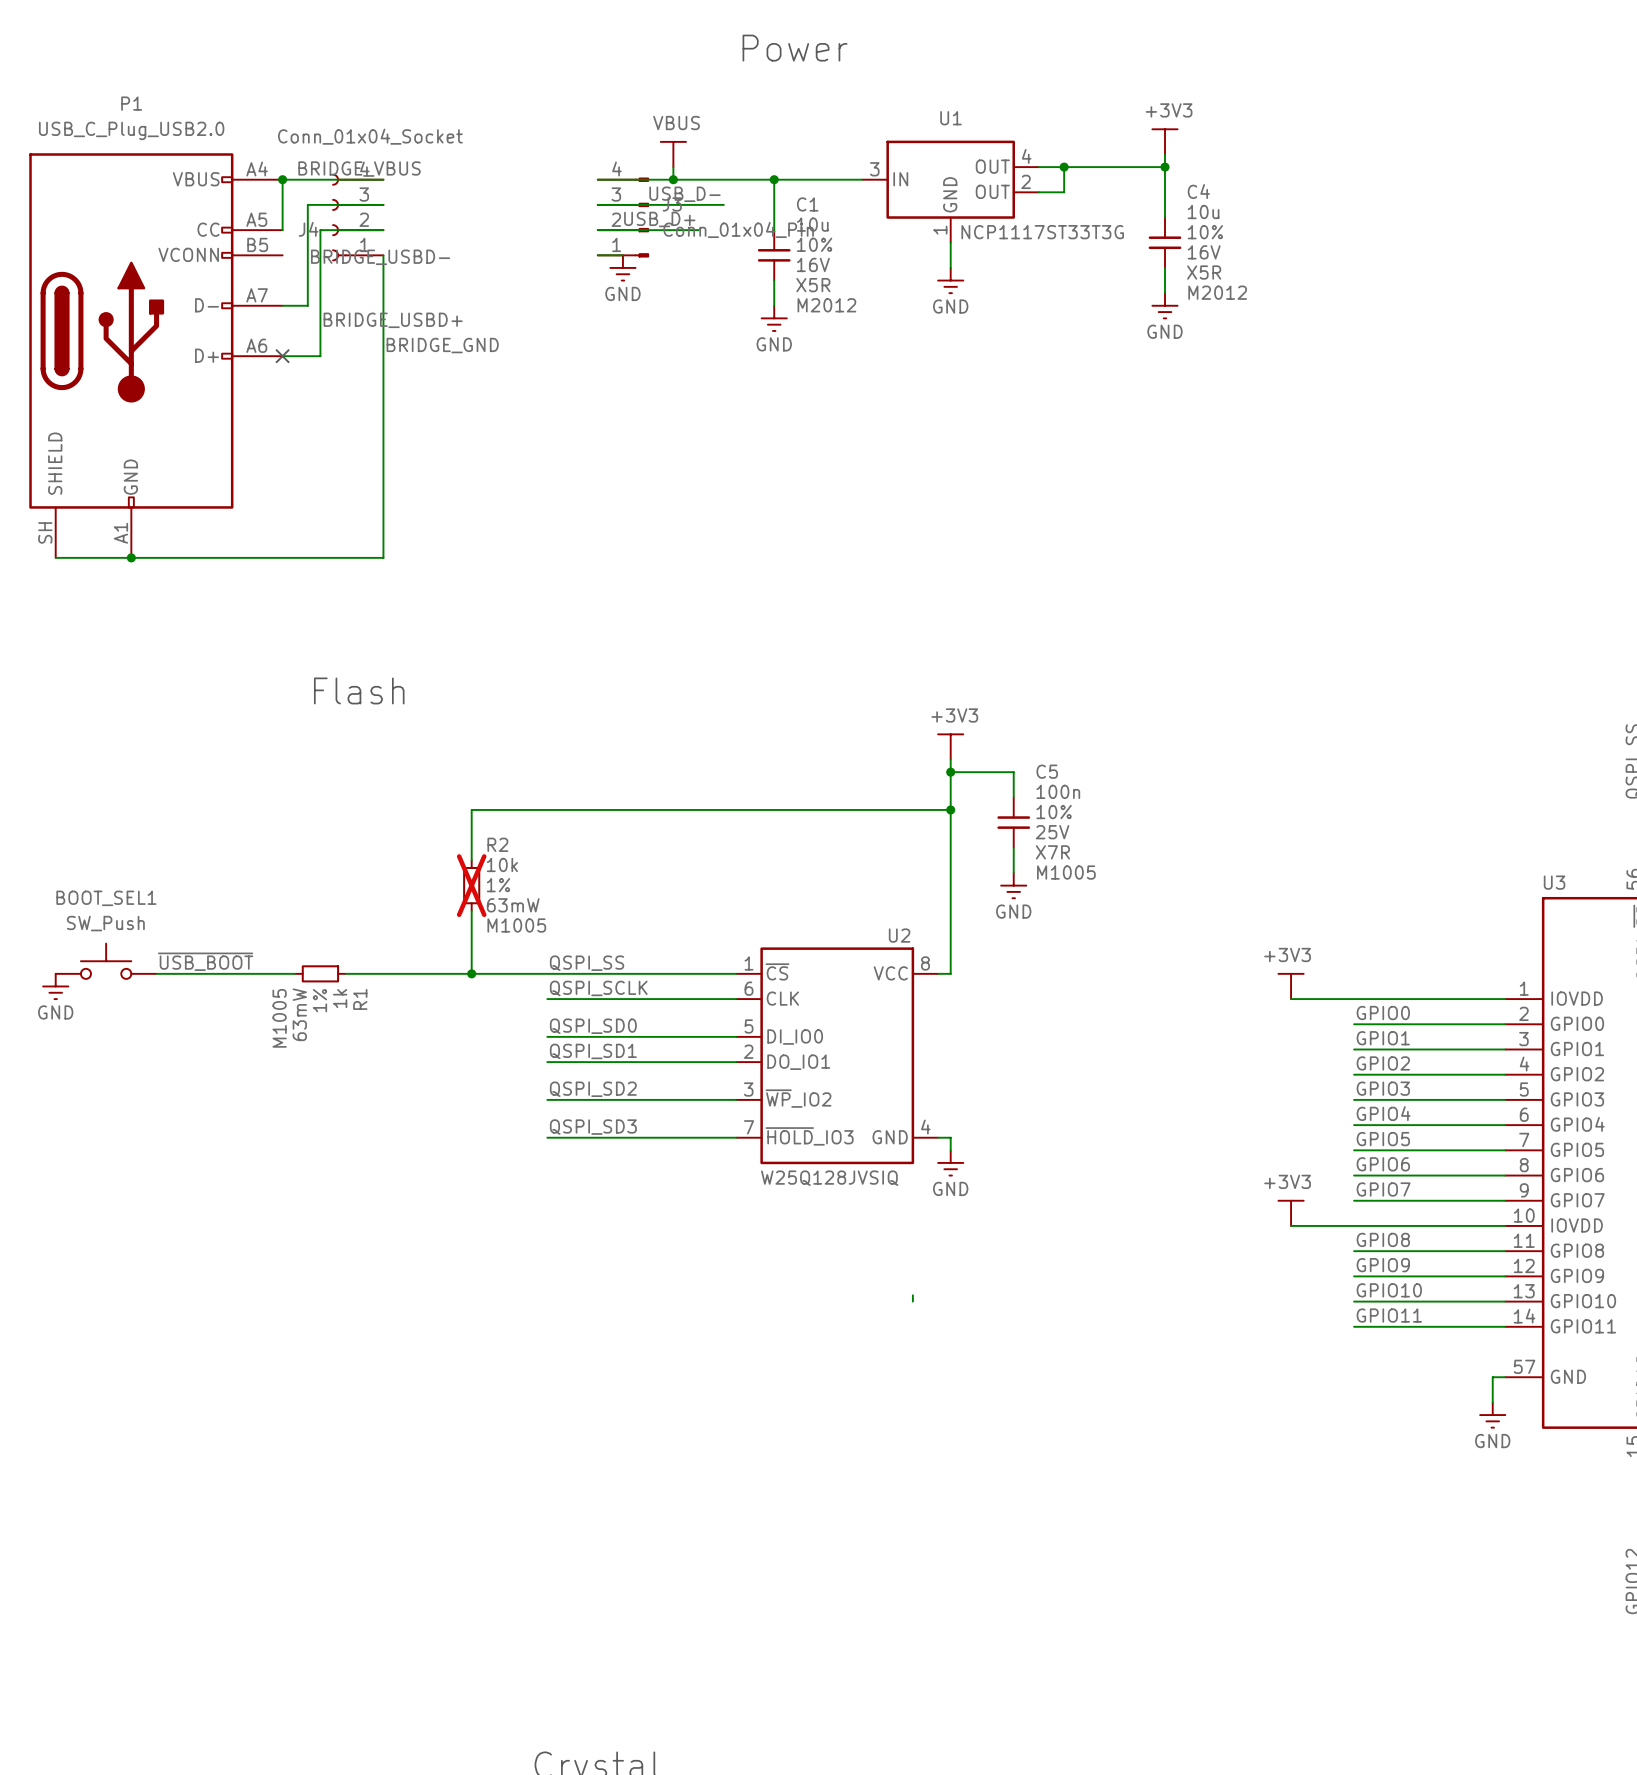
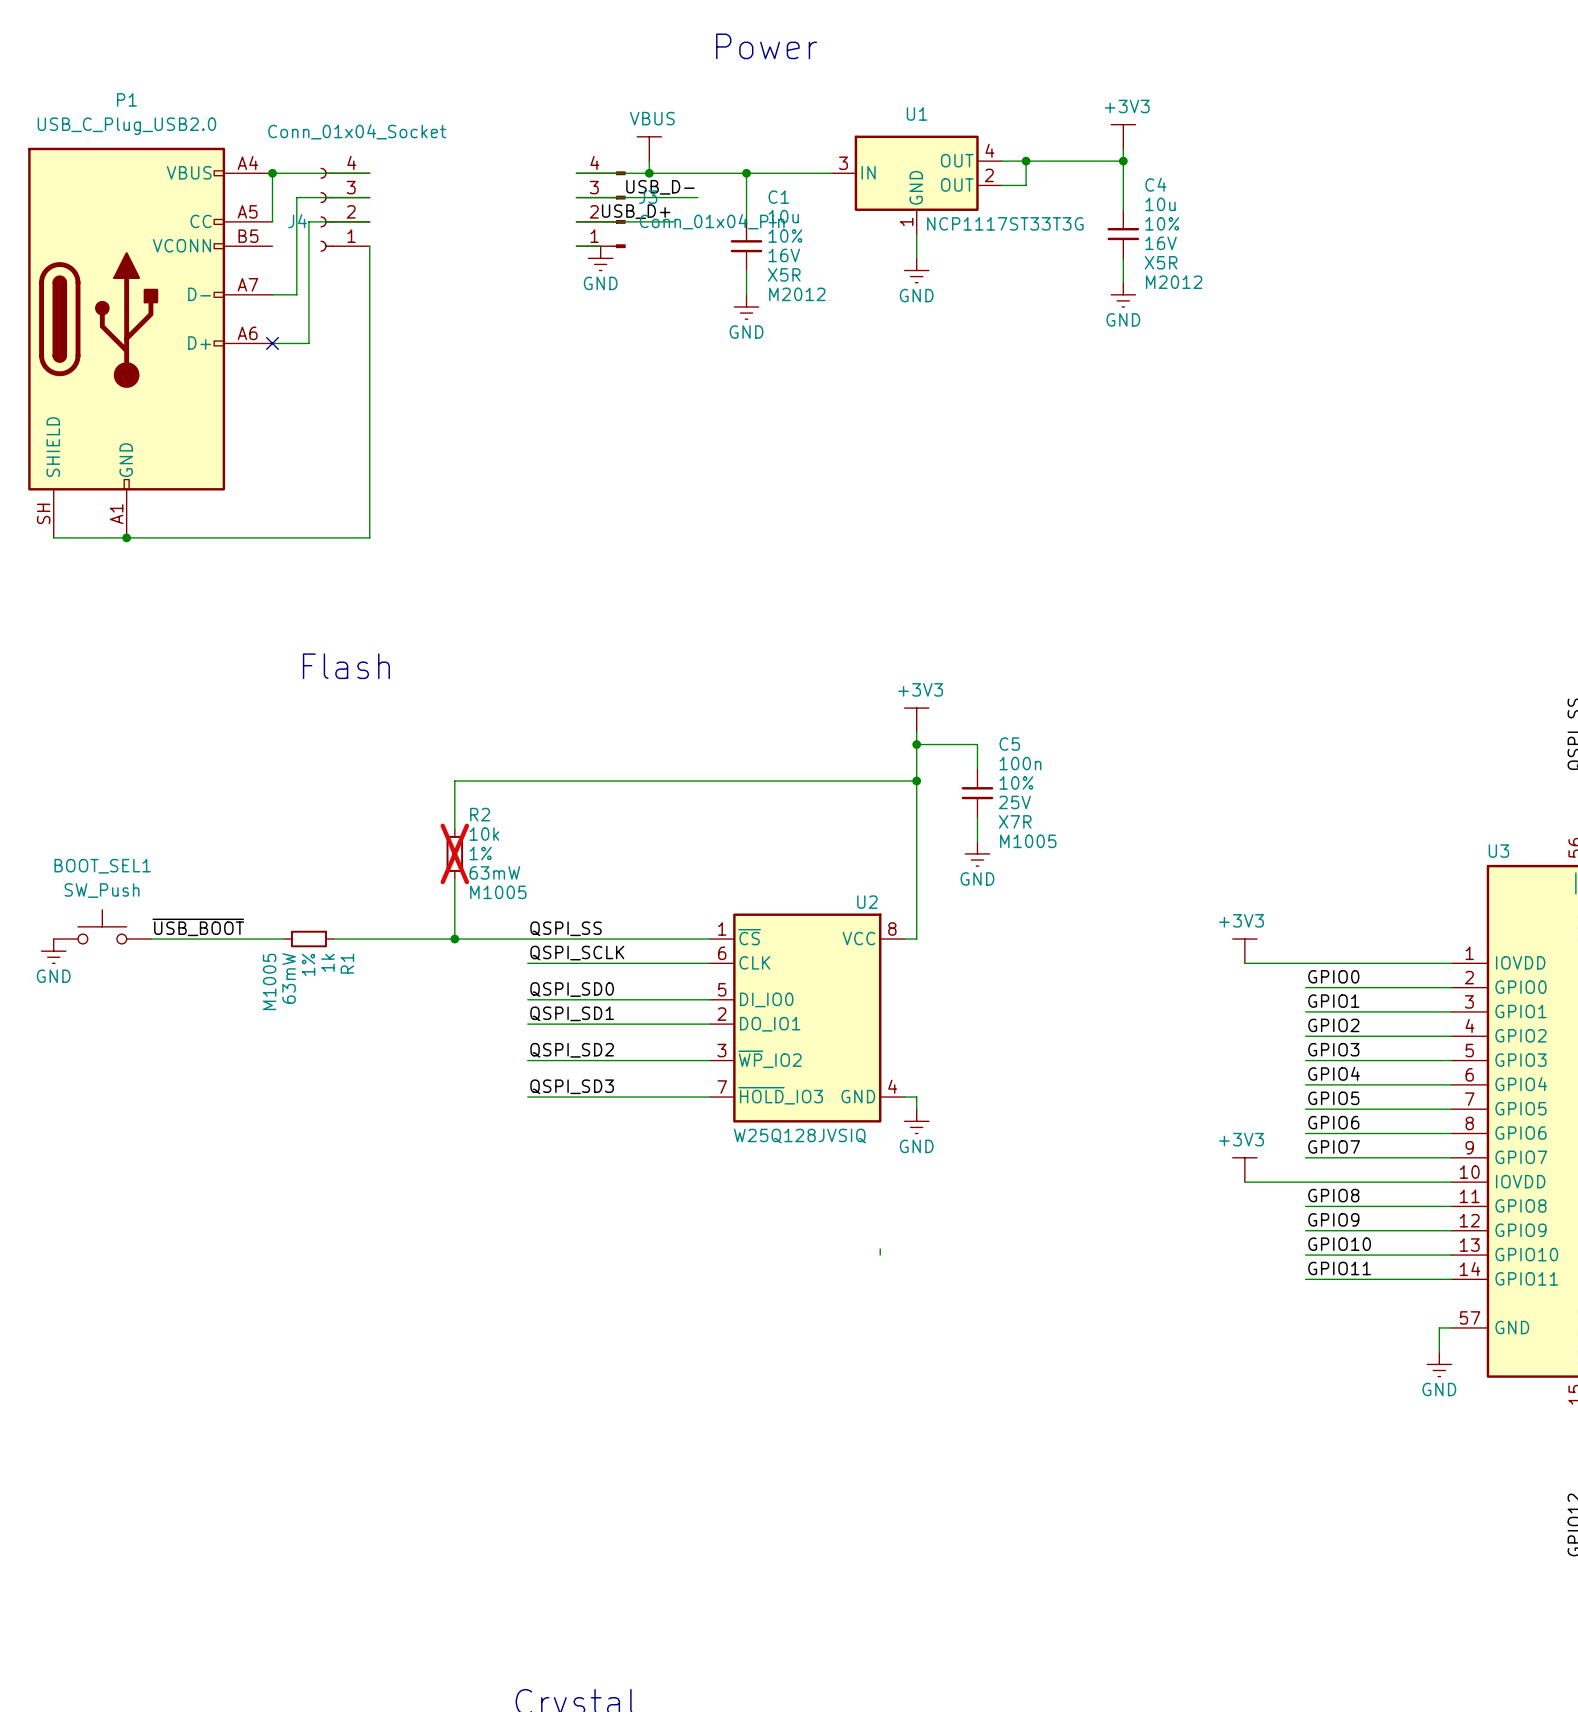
label: BRIDGE_VBUS (359, 169) -> none
label: BRIDGE_USBD- (380, 257) -> none
label: BRIDGE_USBD+ (393, 320) -> none
label: BRIDGE_GND (442, 345) -> none

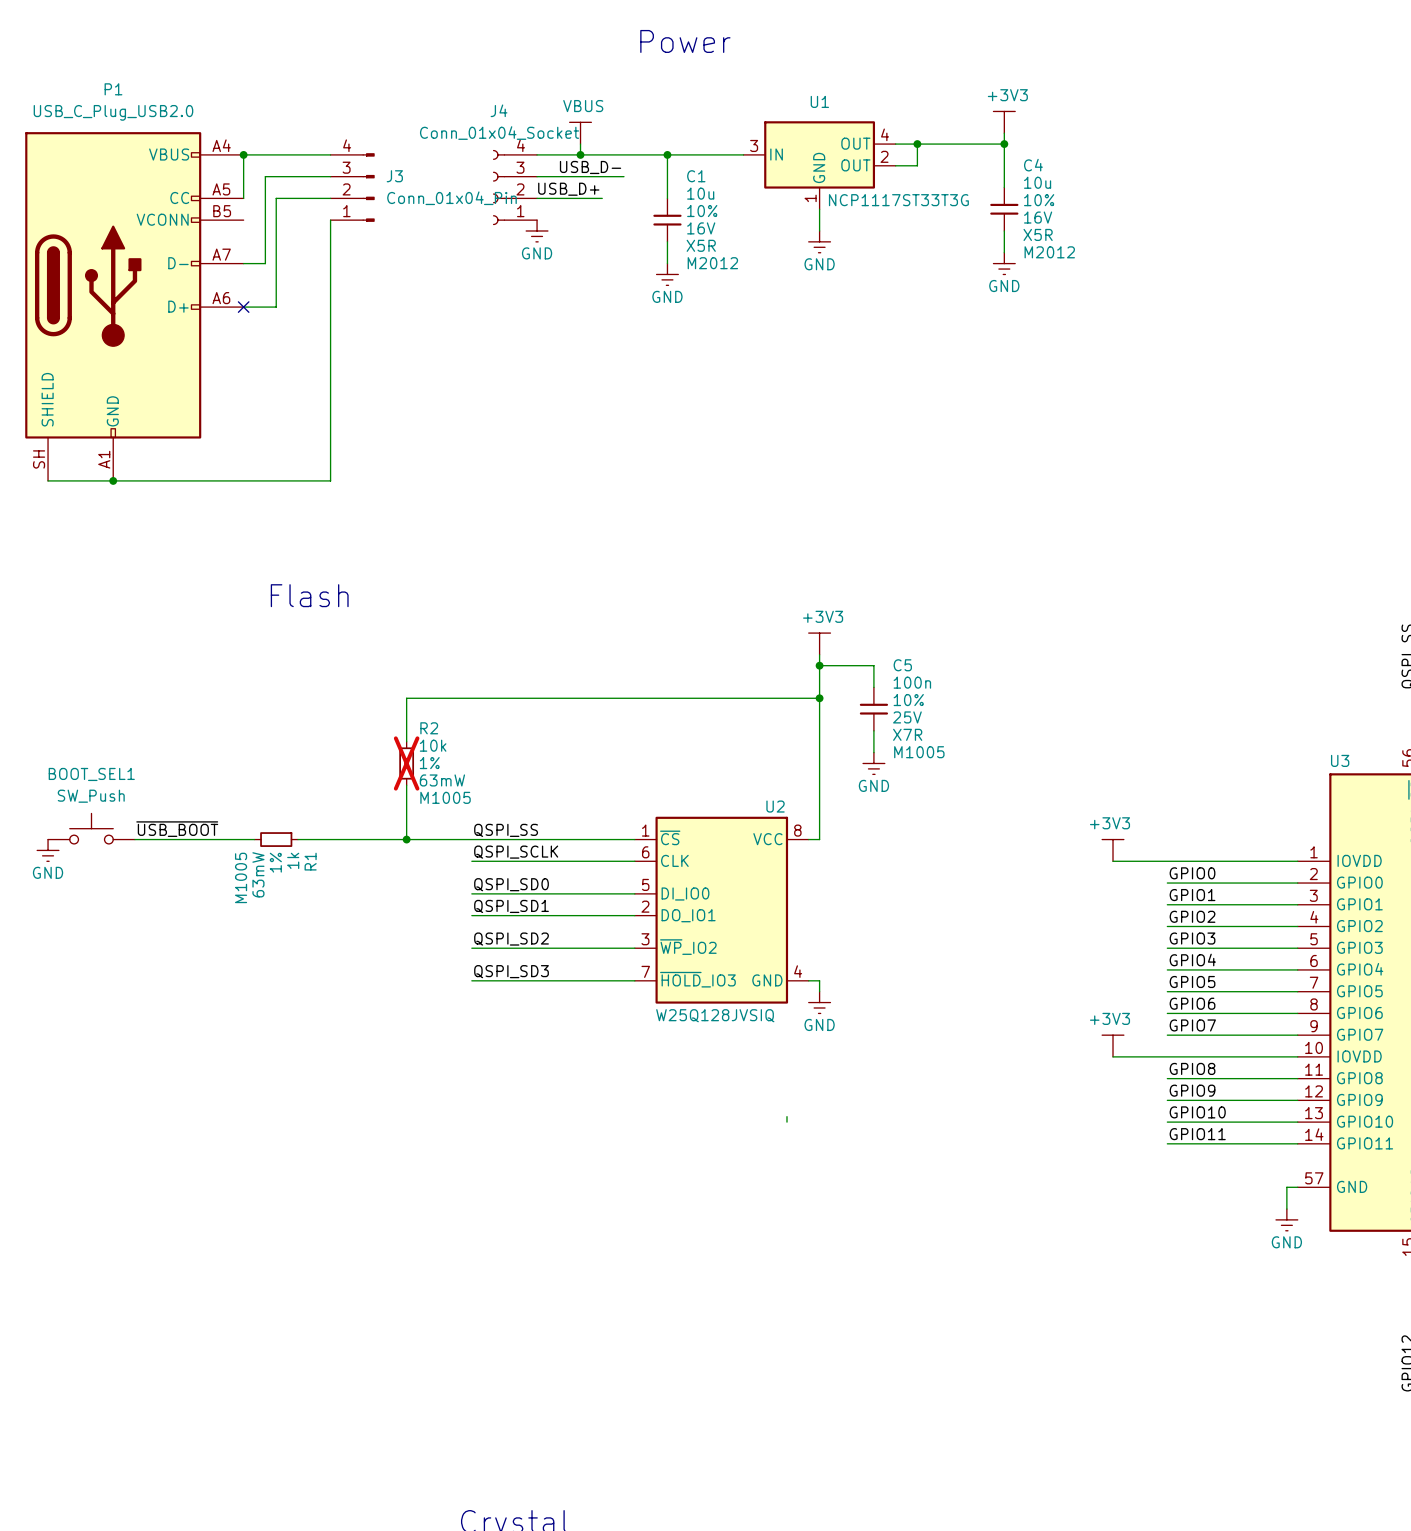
J4 value position: Conn_01x04_Socket (357, 131) -> Conn_01x04_Socket (499, 133)
J4 position: (345, 209) -> (514, 187)
J3 position: (601, 209) -> (352, 187)
J4 name position: J4 (297, 221) -> J4 (499, 110)

